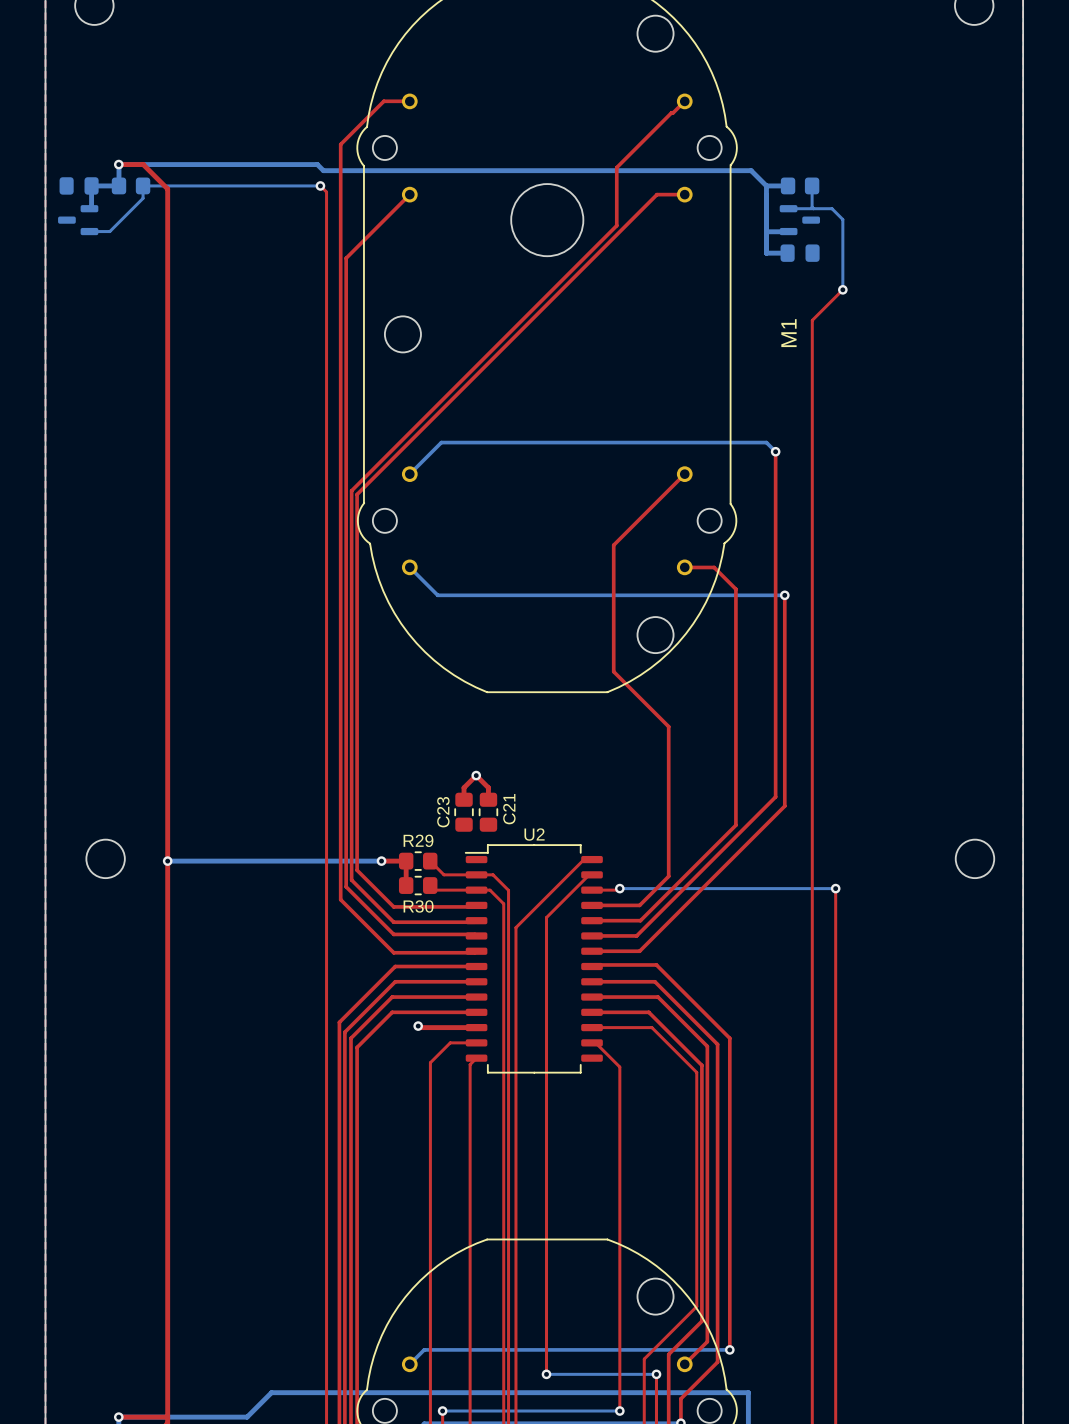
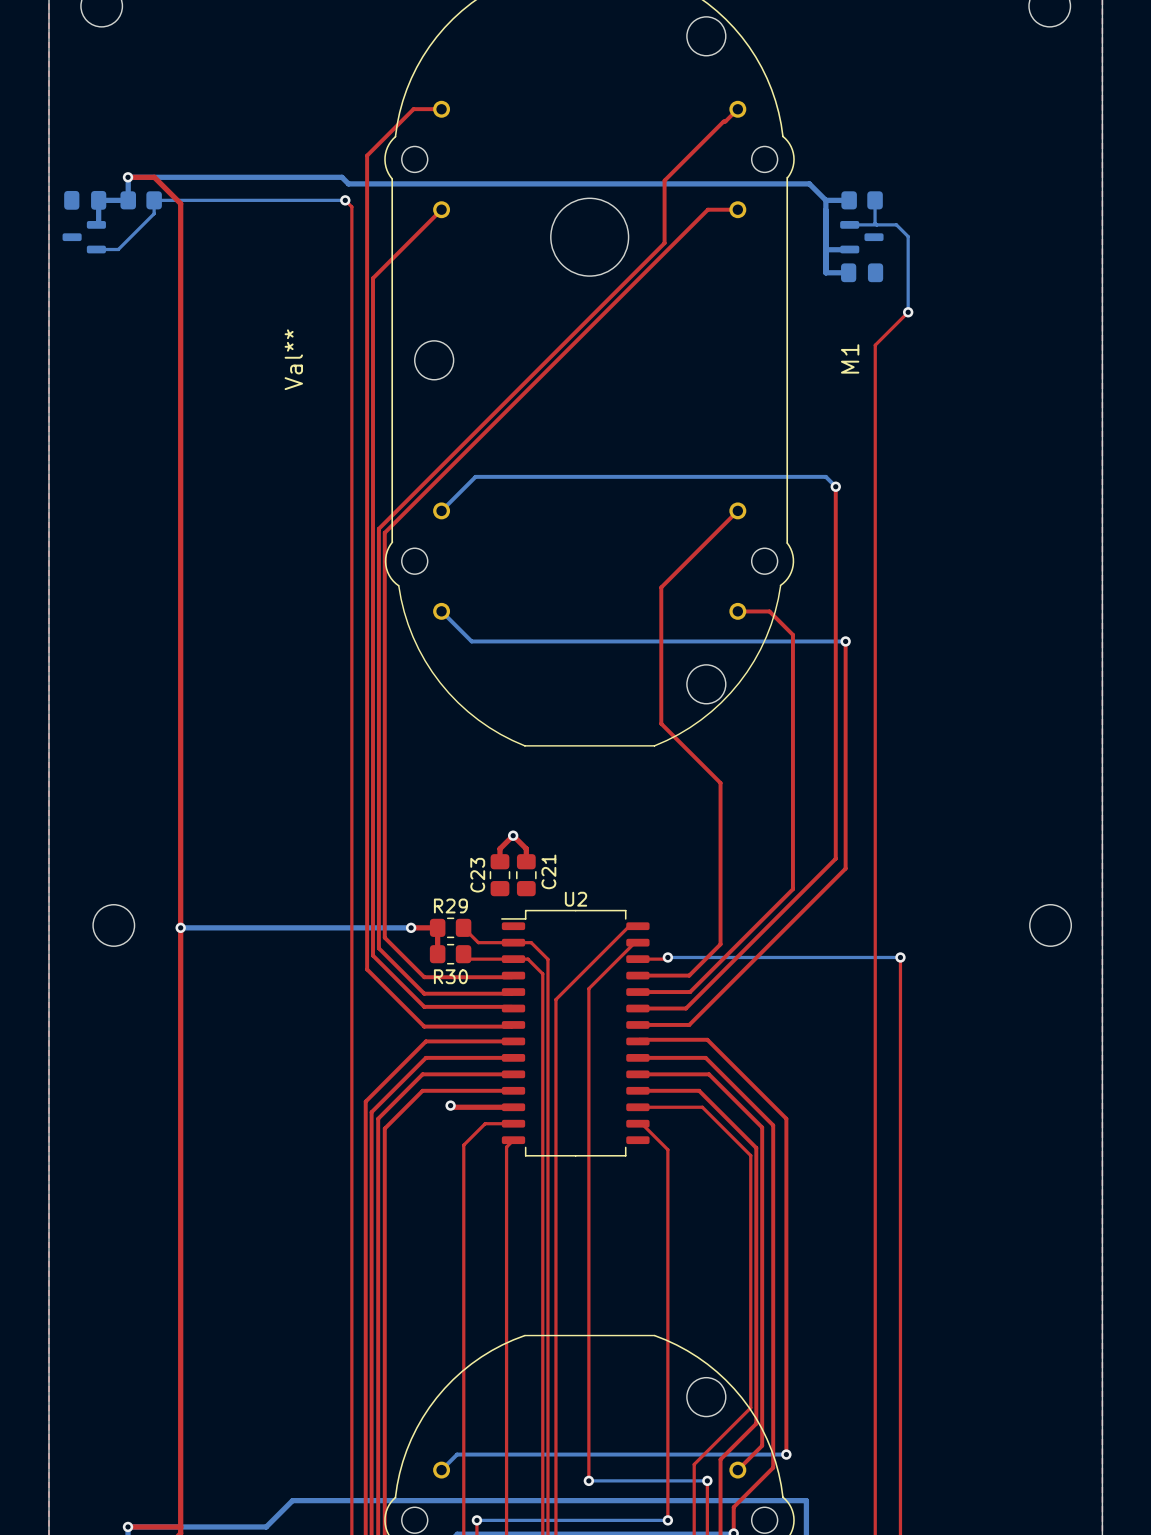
M1 value: none -> Val** (293, 359)

